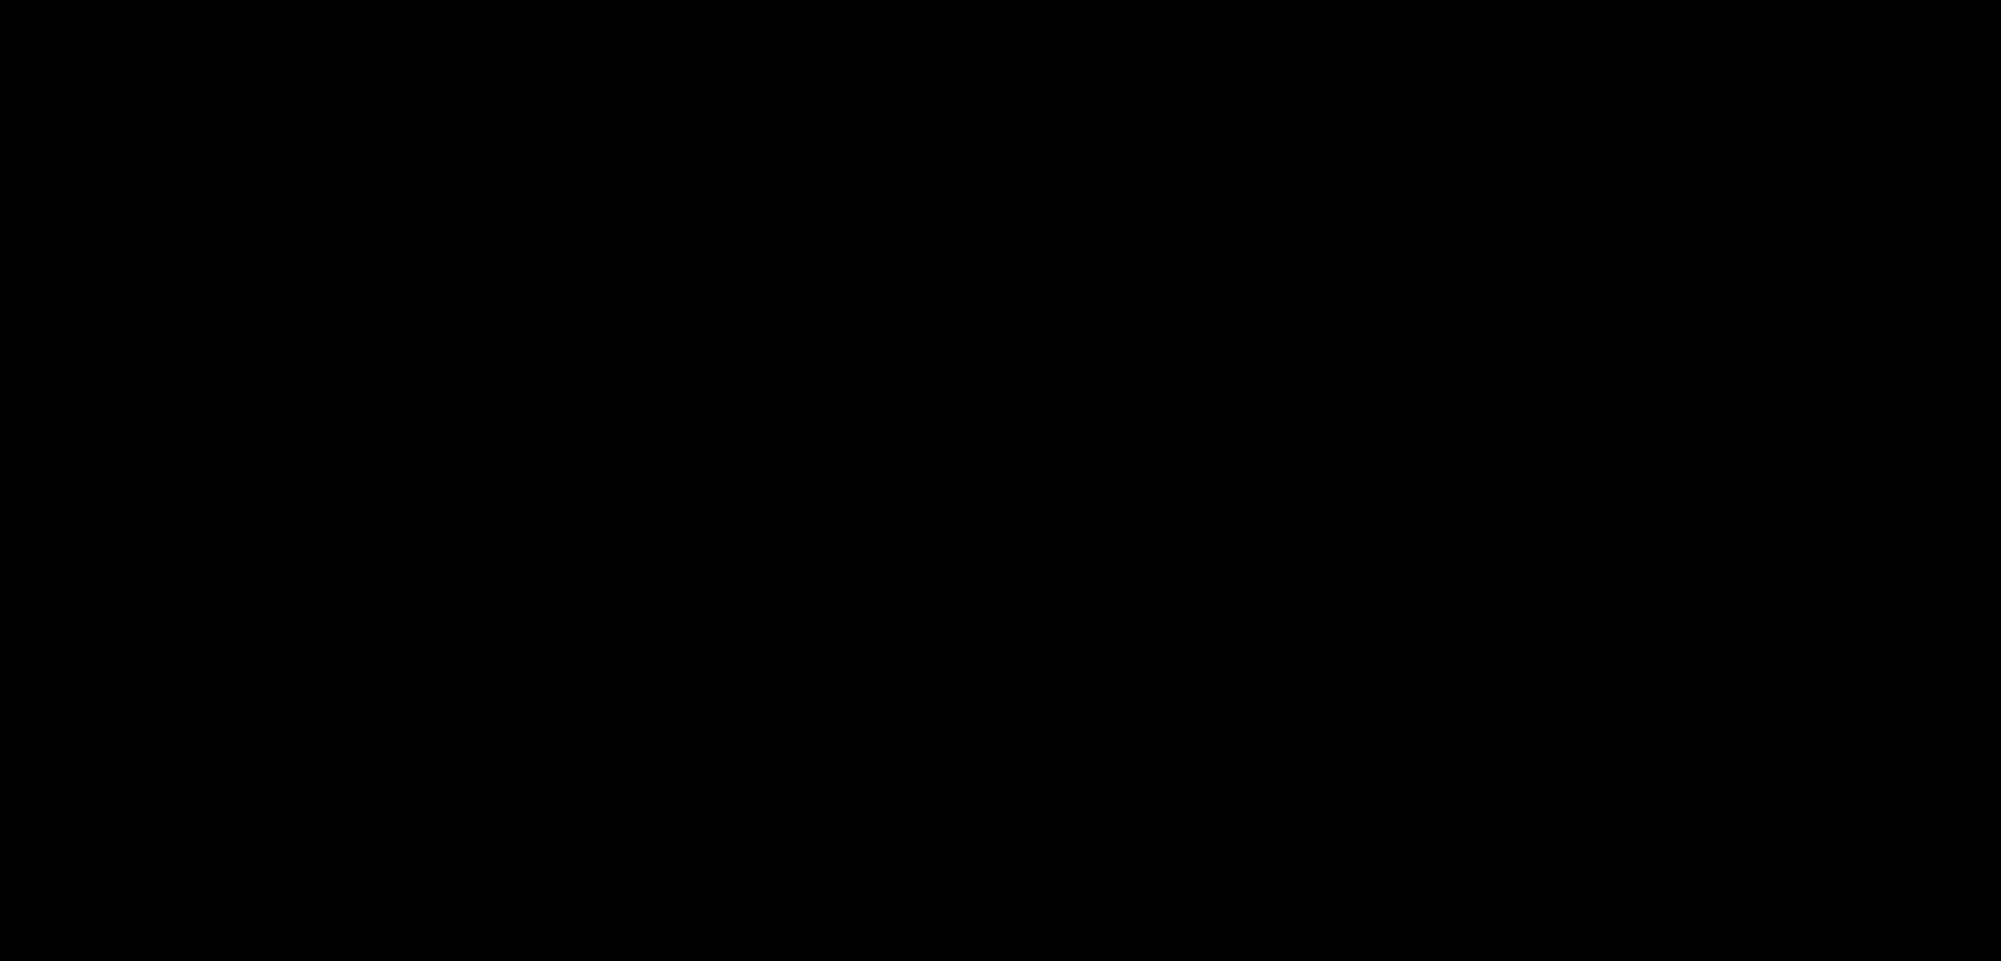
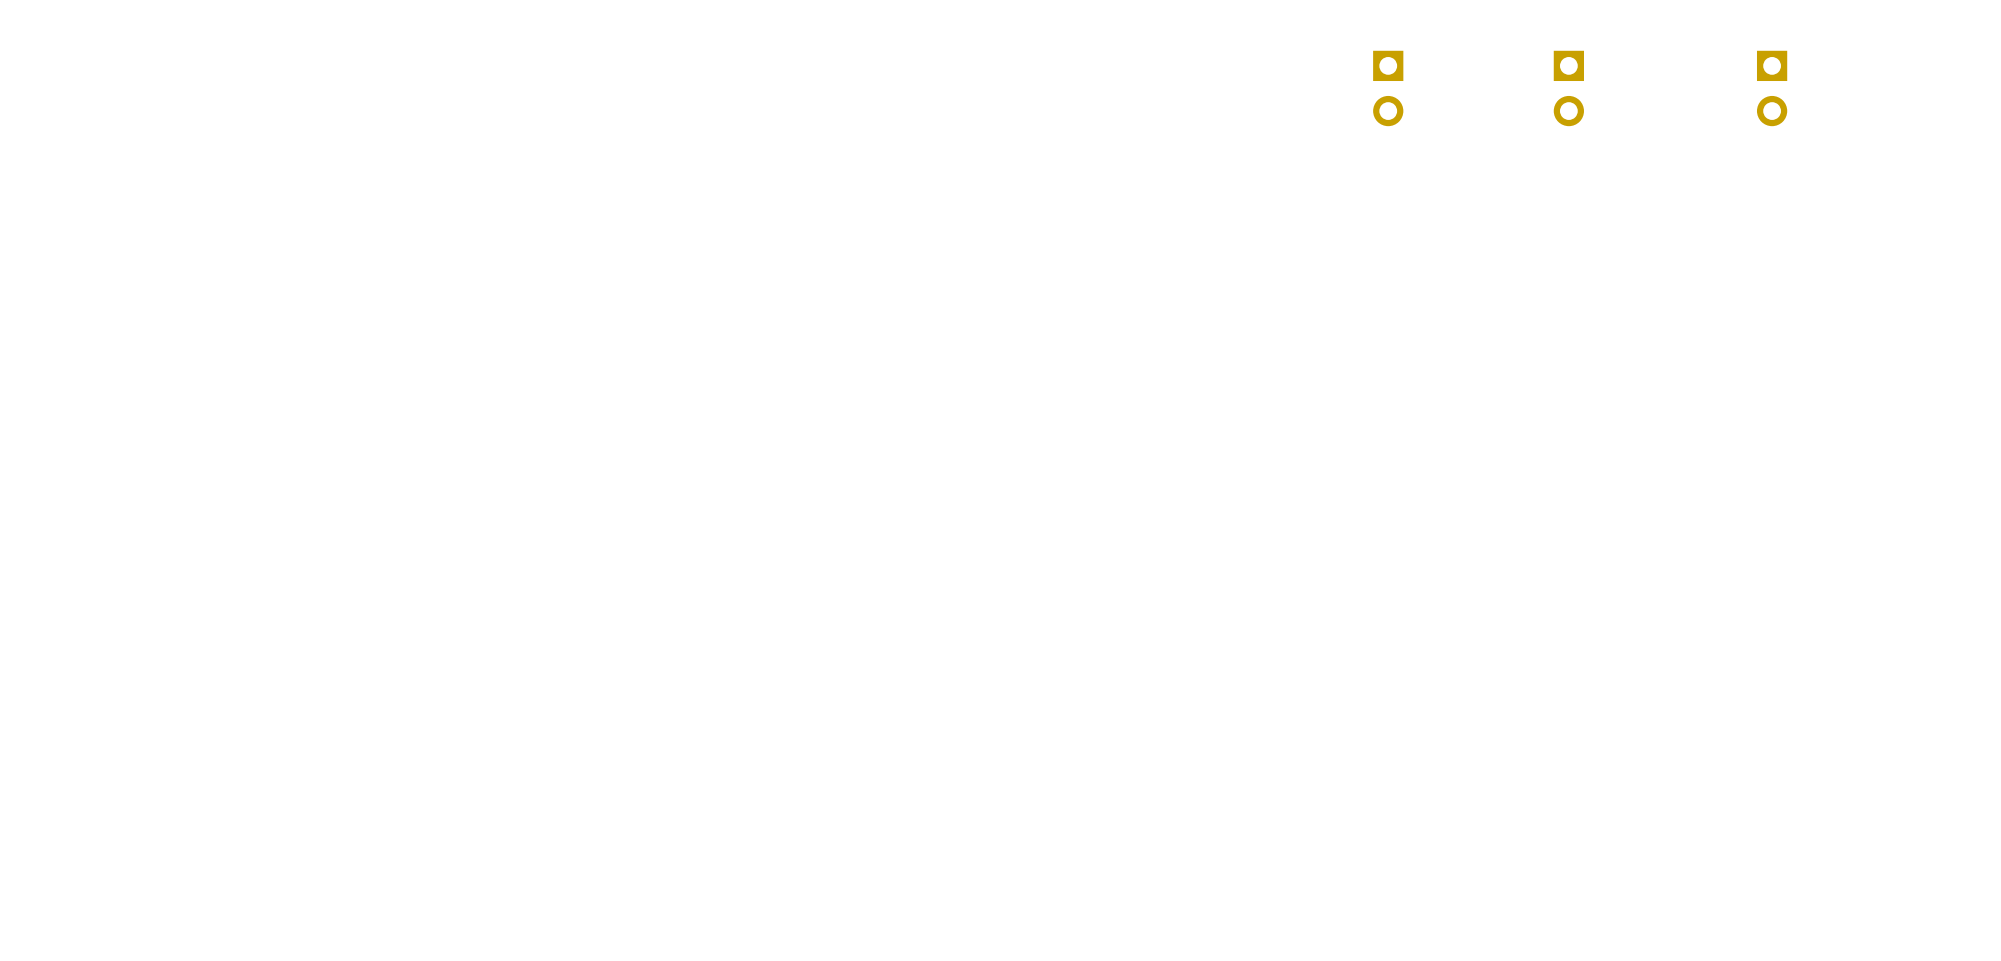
part: none -> (1388, 88)
part: none -> (1568, 88)
part: none -> (1772, 88)

